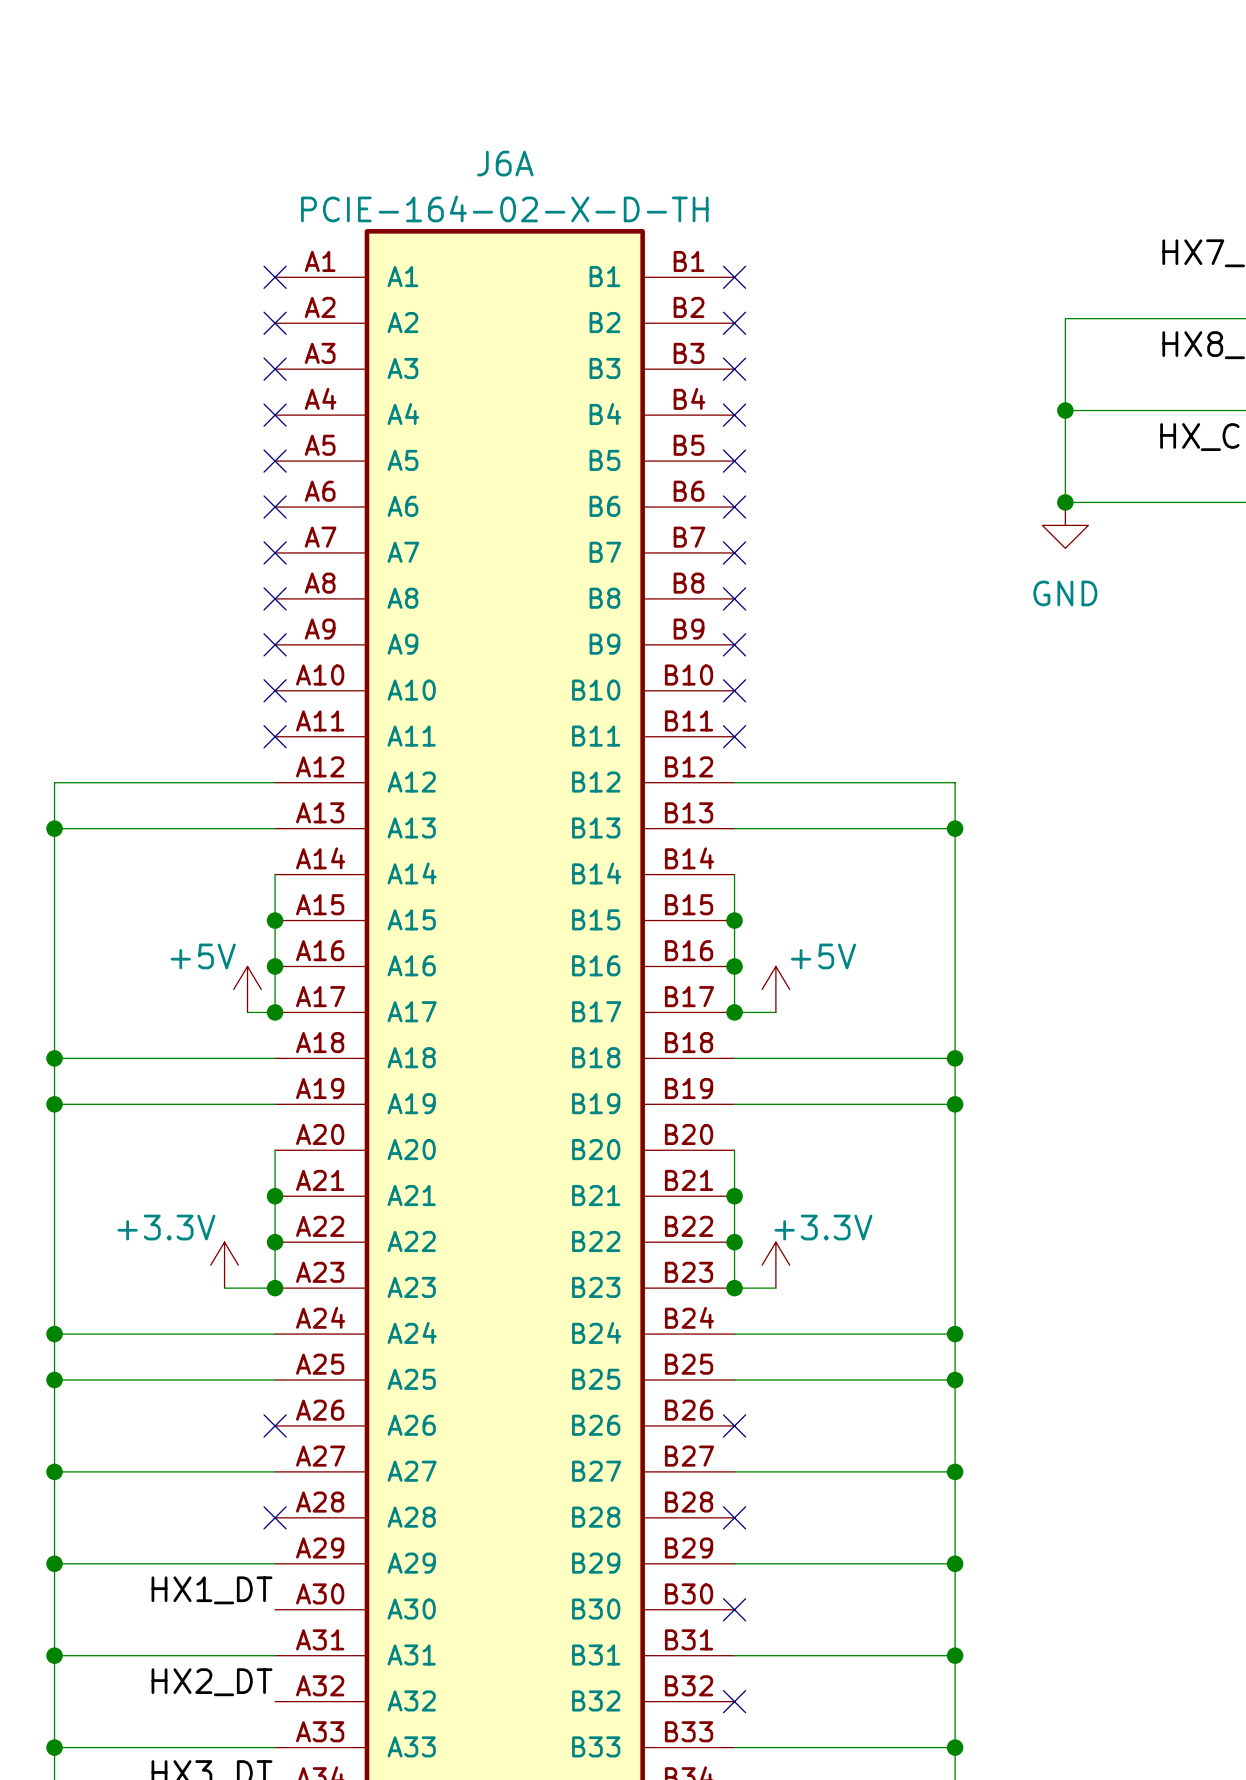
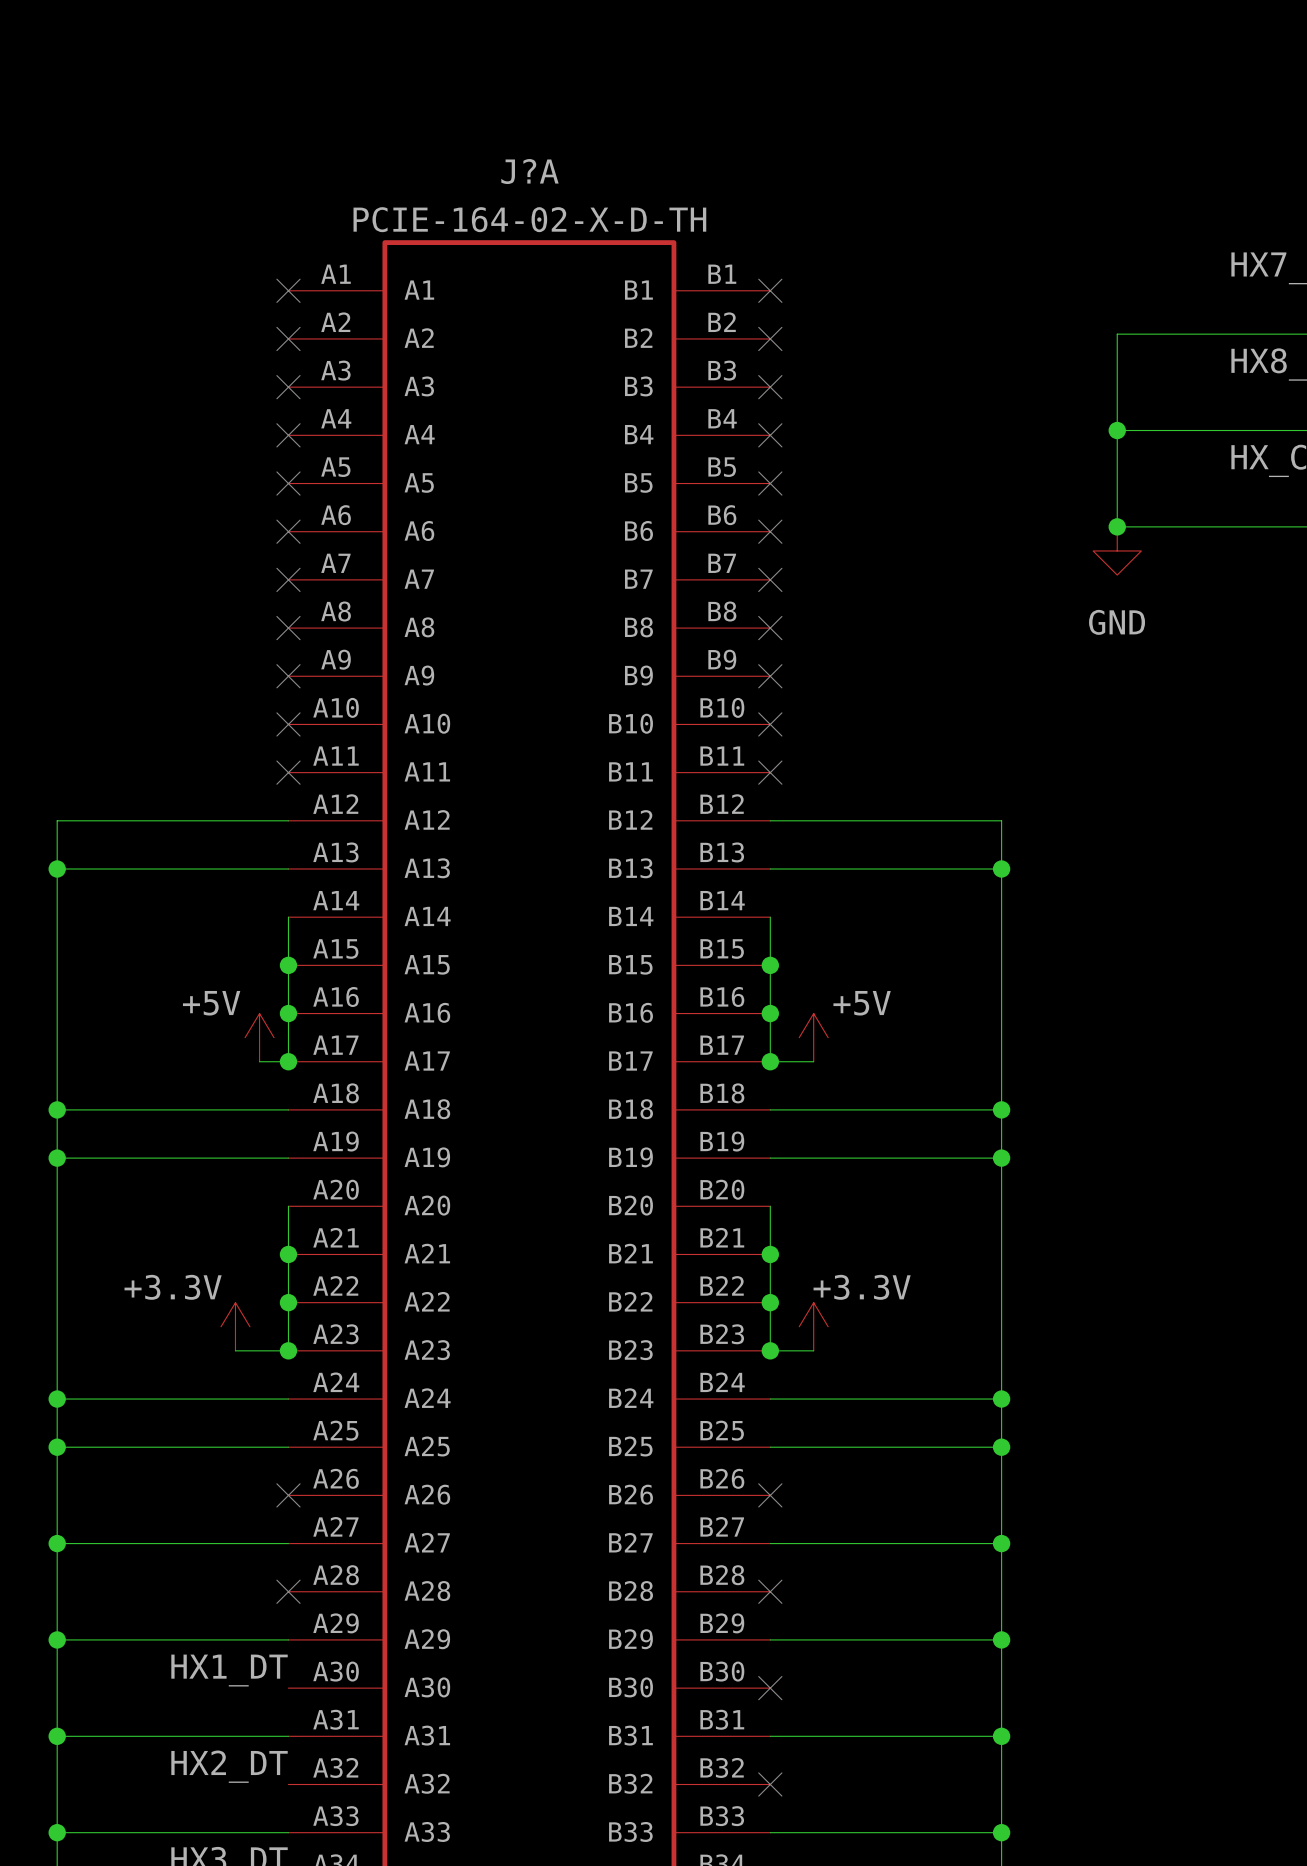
J6A name: J6A (505, 163) -> J?A (529, 171)

